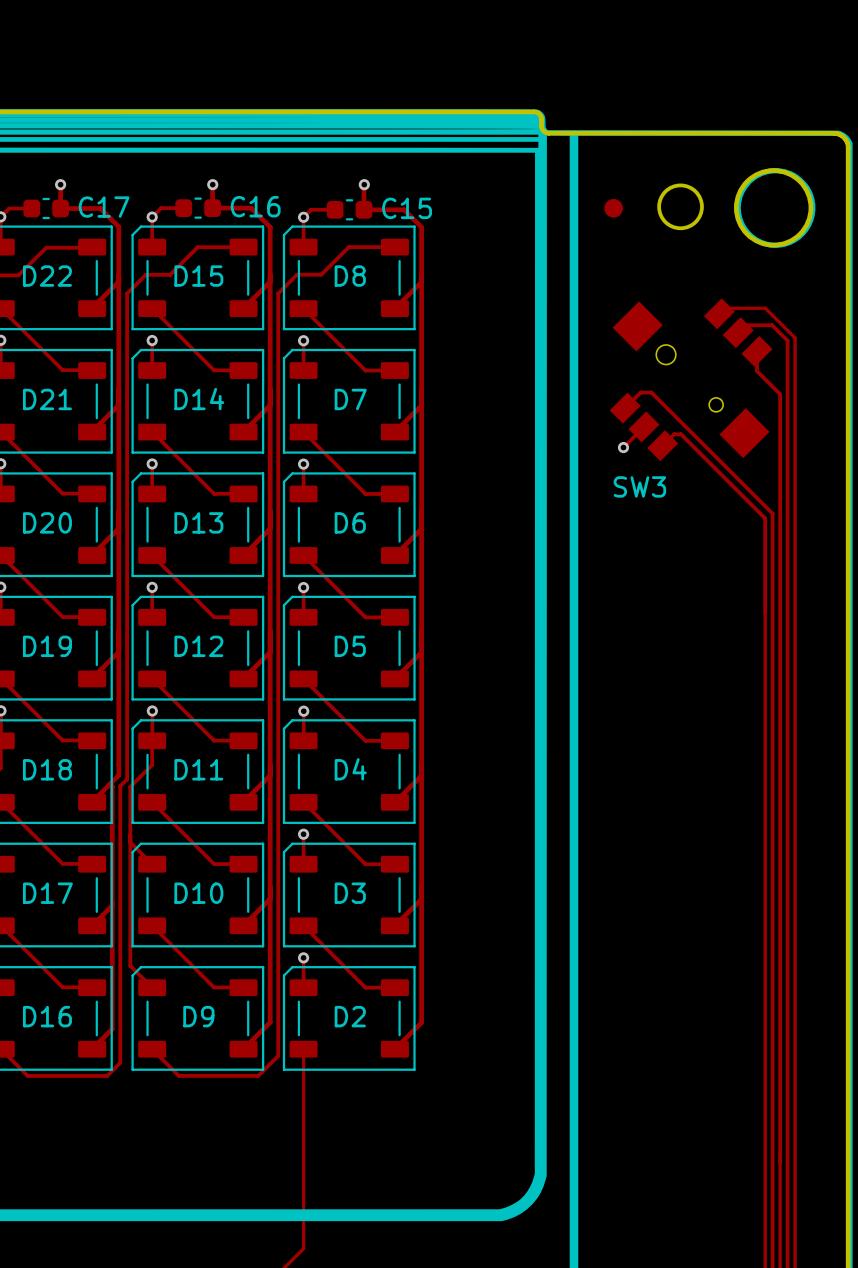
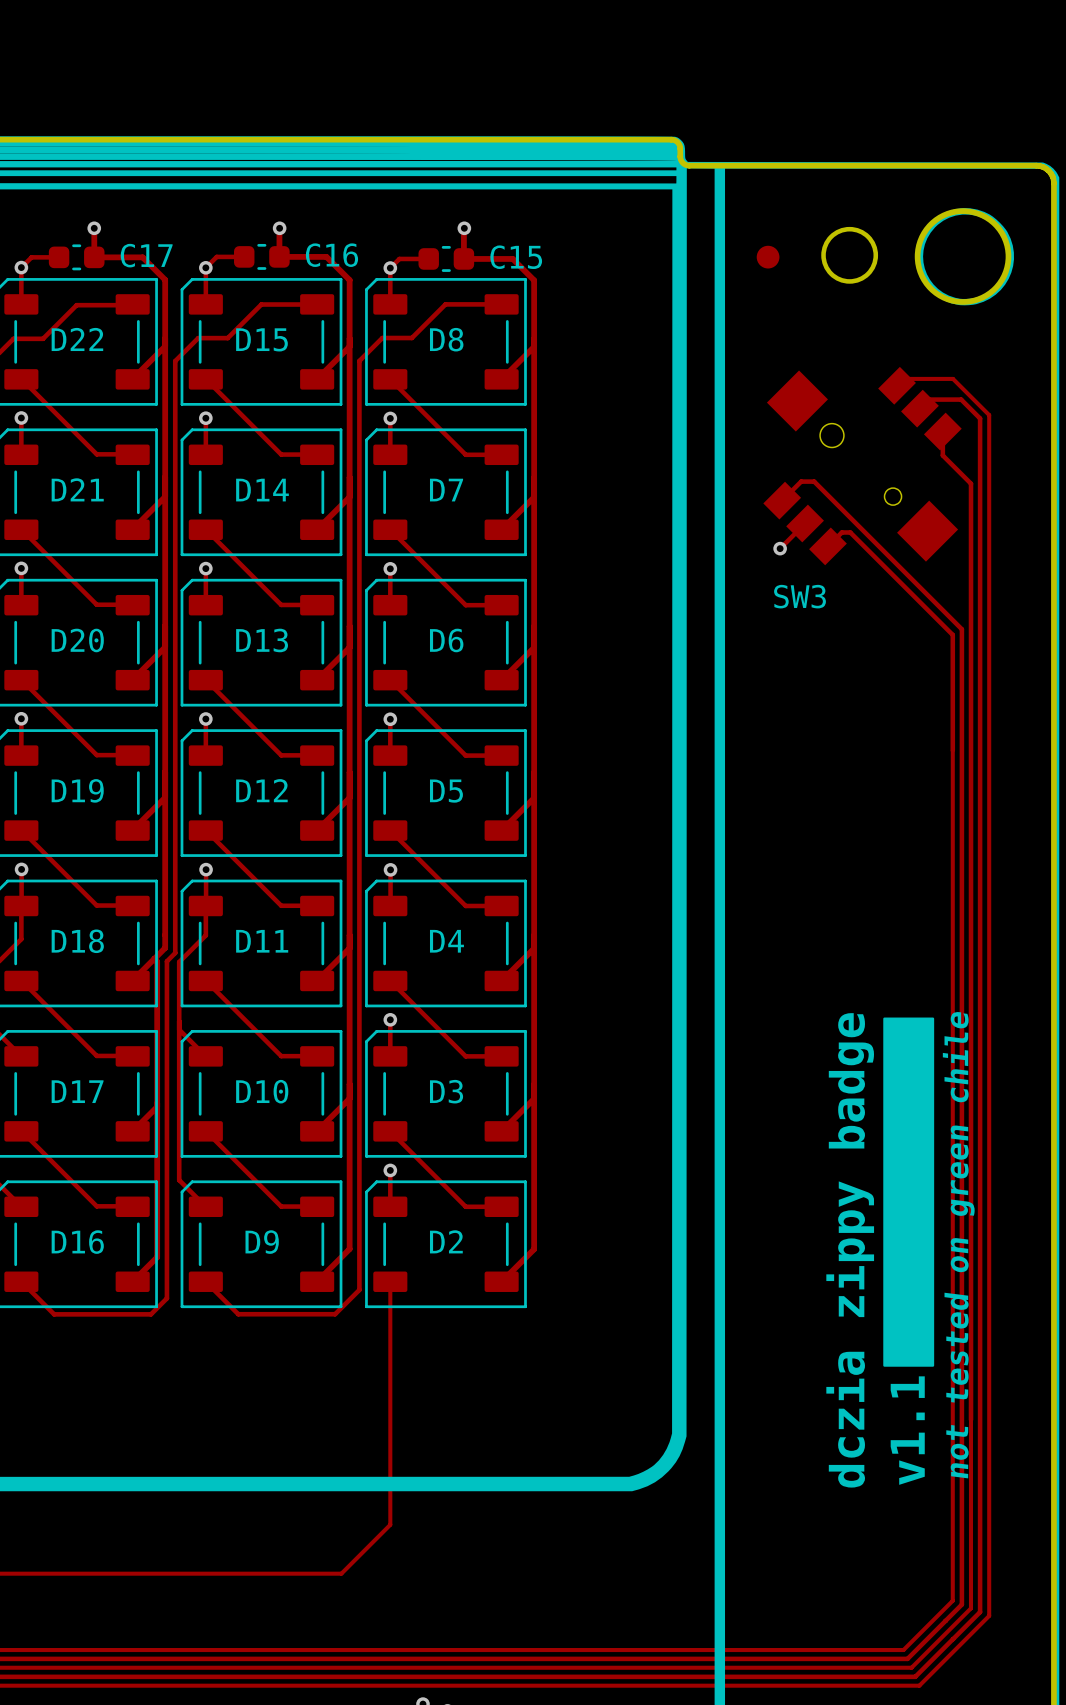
drawing: none -> [883, 1017, 935, 1367]
text: none -> dczia zippy badge (850, 1250)
text: none -> not tested on green chile (958, 1245)
text: none -> v1.1 (907, 1430)

